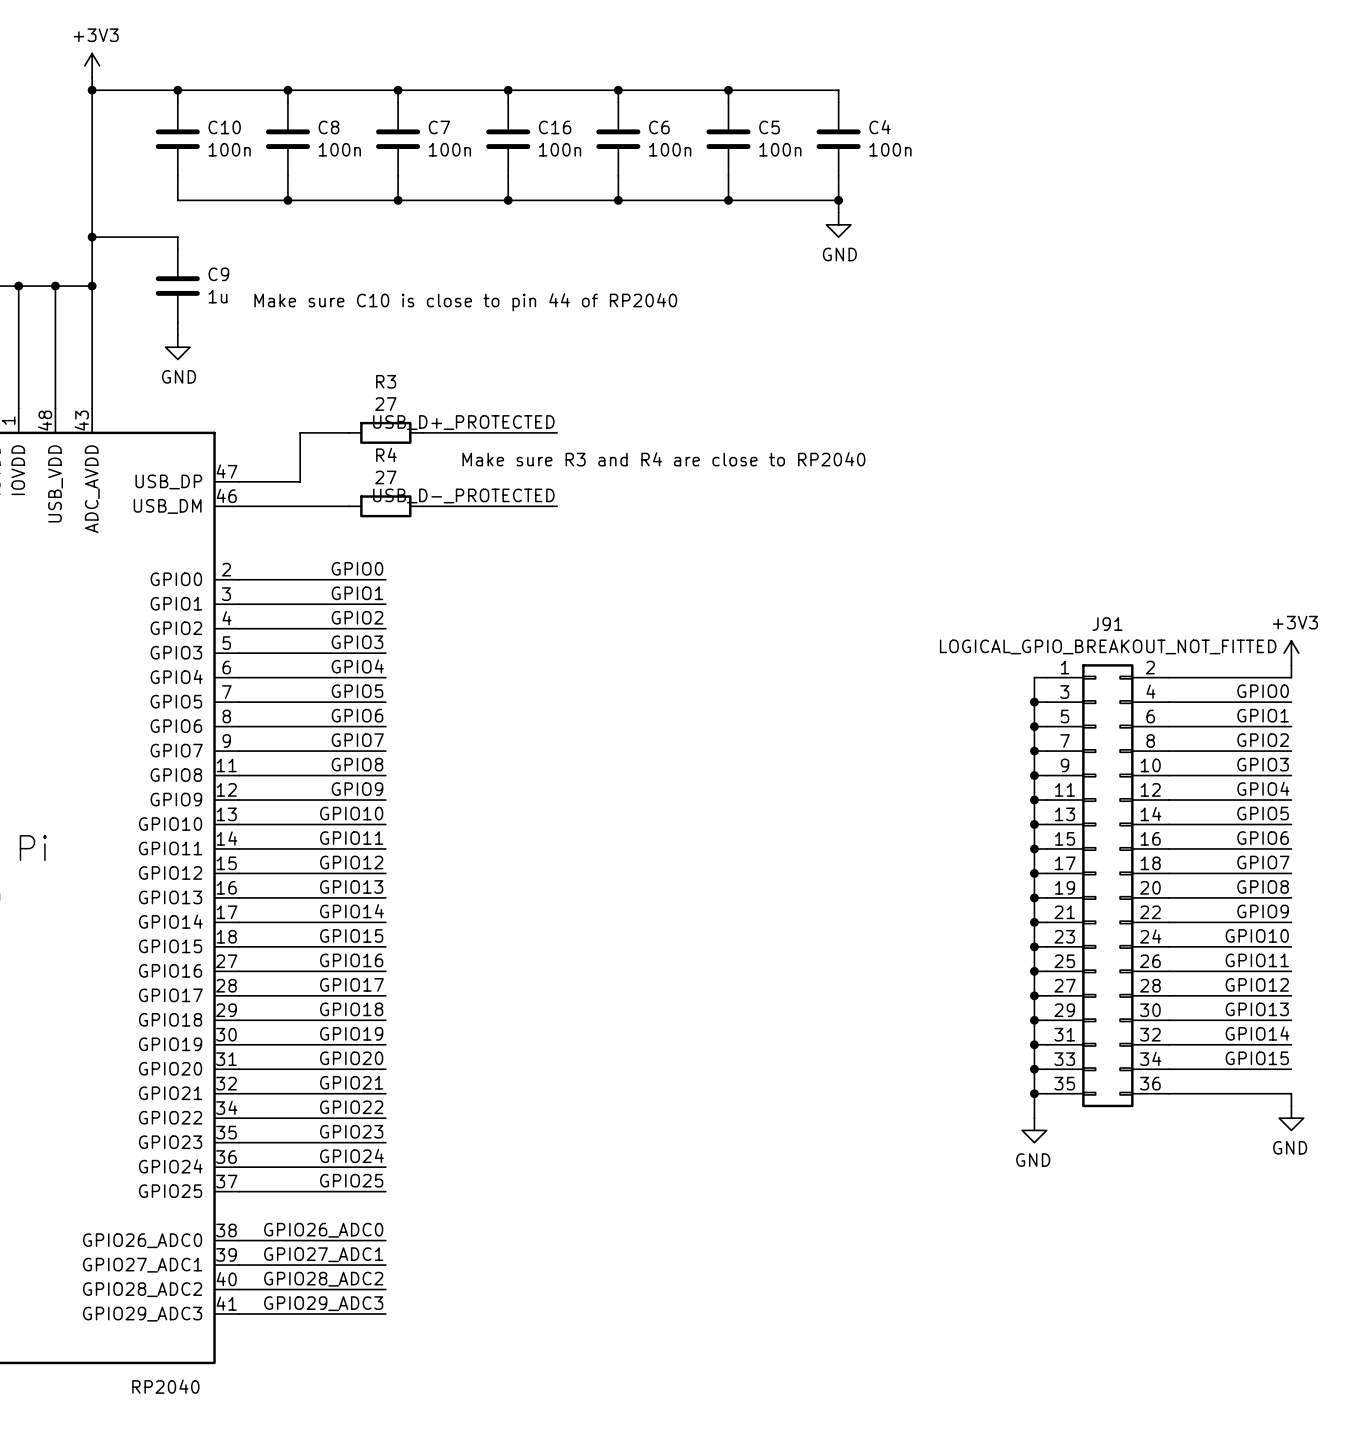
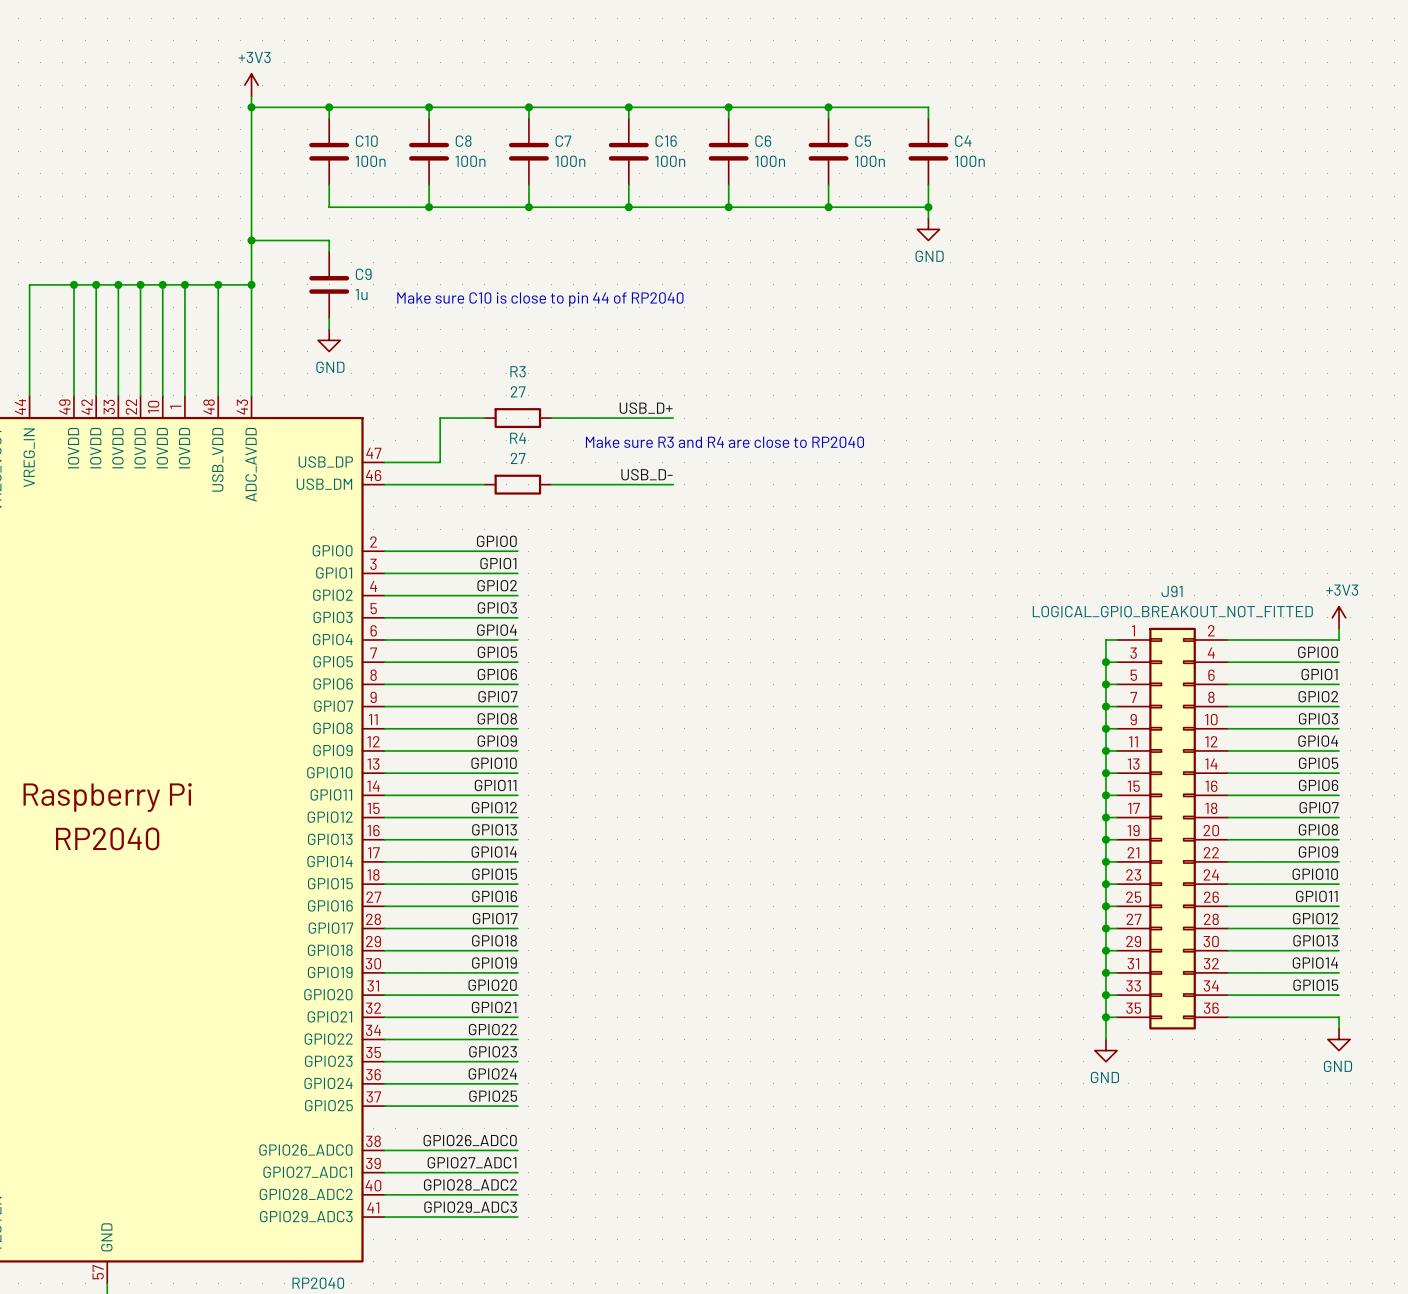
label: USB_D+_PROTECTED (463, 422) -> USB_D+ (646, 408)
label: USB_D-_PROTECTED (463, 495) -> USB_D- (646, 474)

